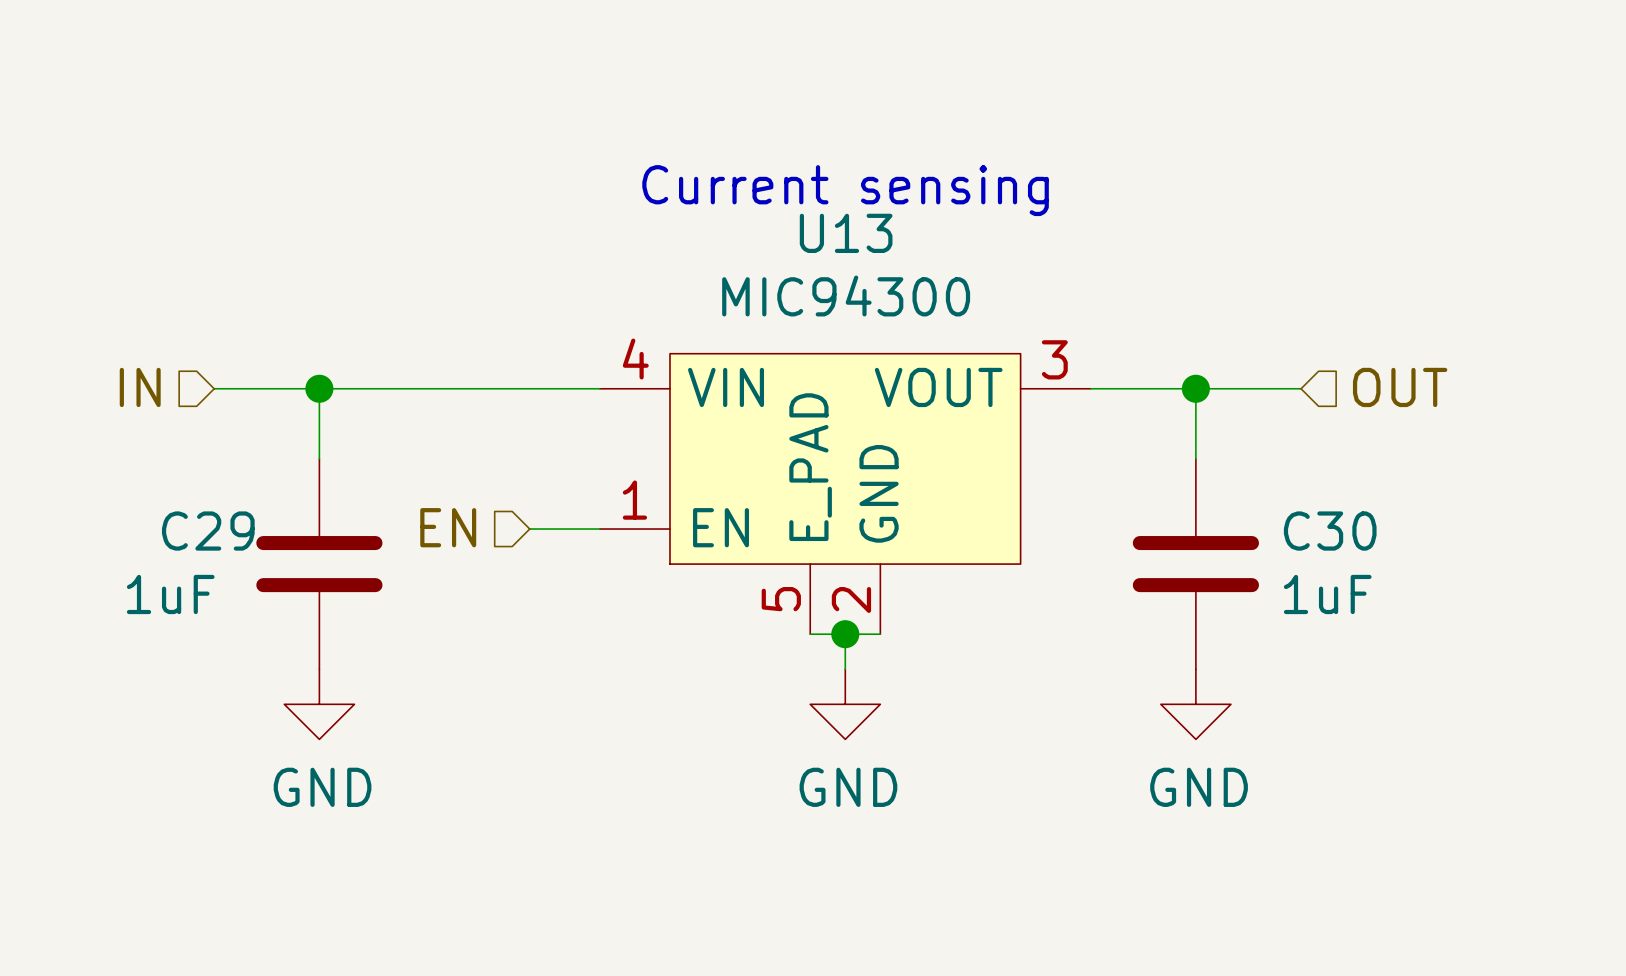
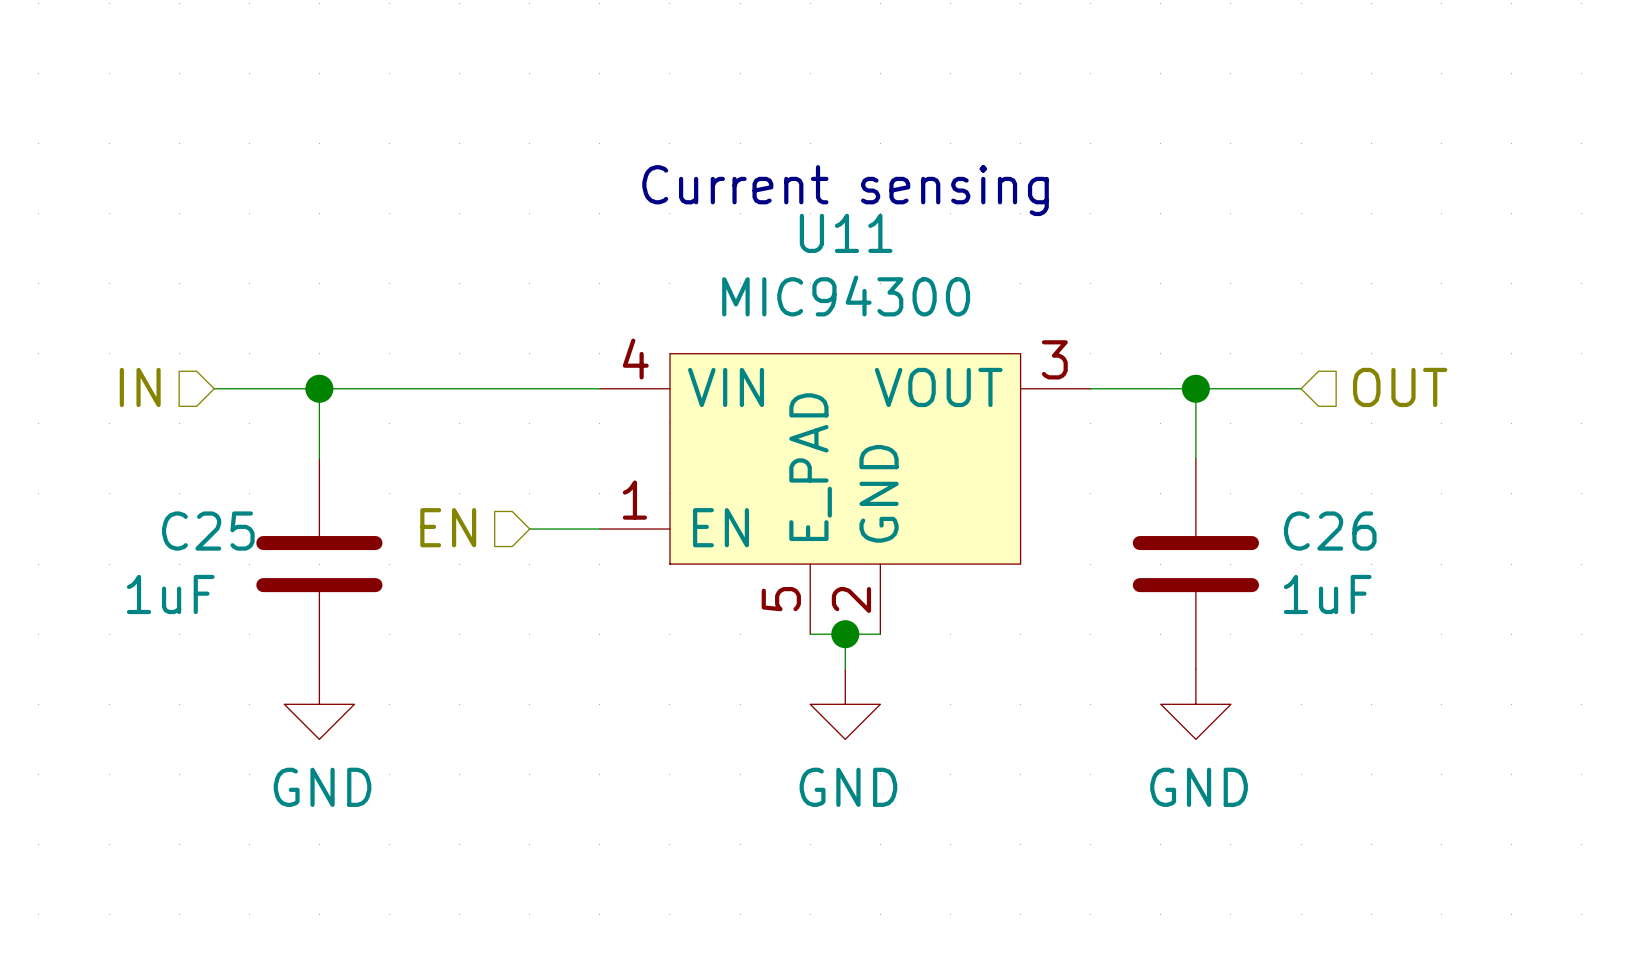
U13 name: U13 (846, 233) -> U11 (846, 233)
C29 name: C29 (208, 531) -> C25 (208, 531)
C30 name: C30 (1330, 531) -> C26 (1330, 531)

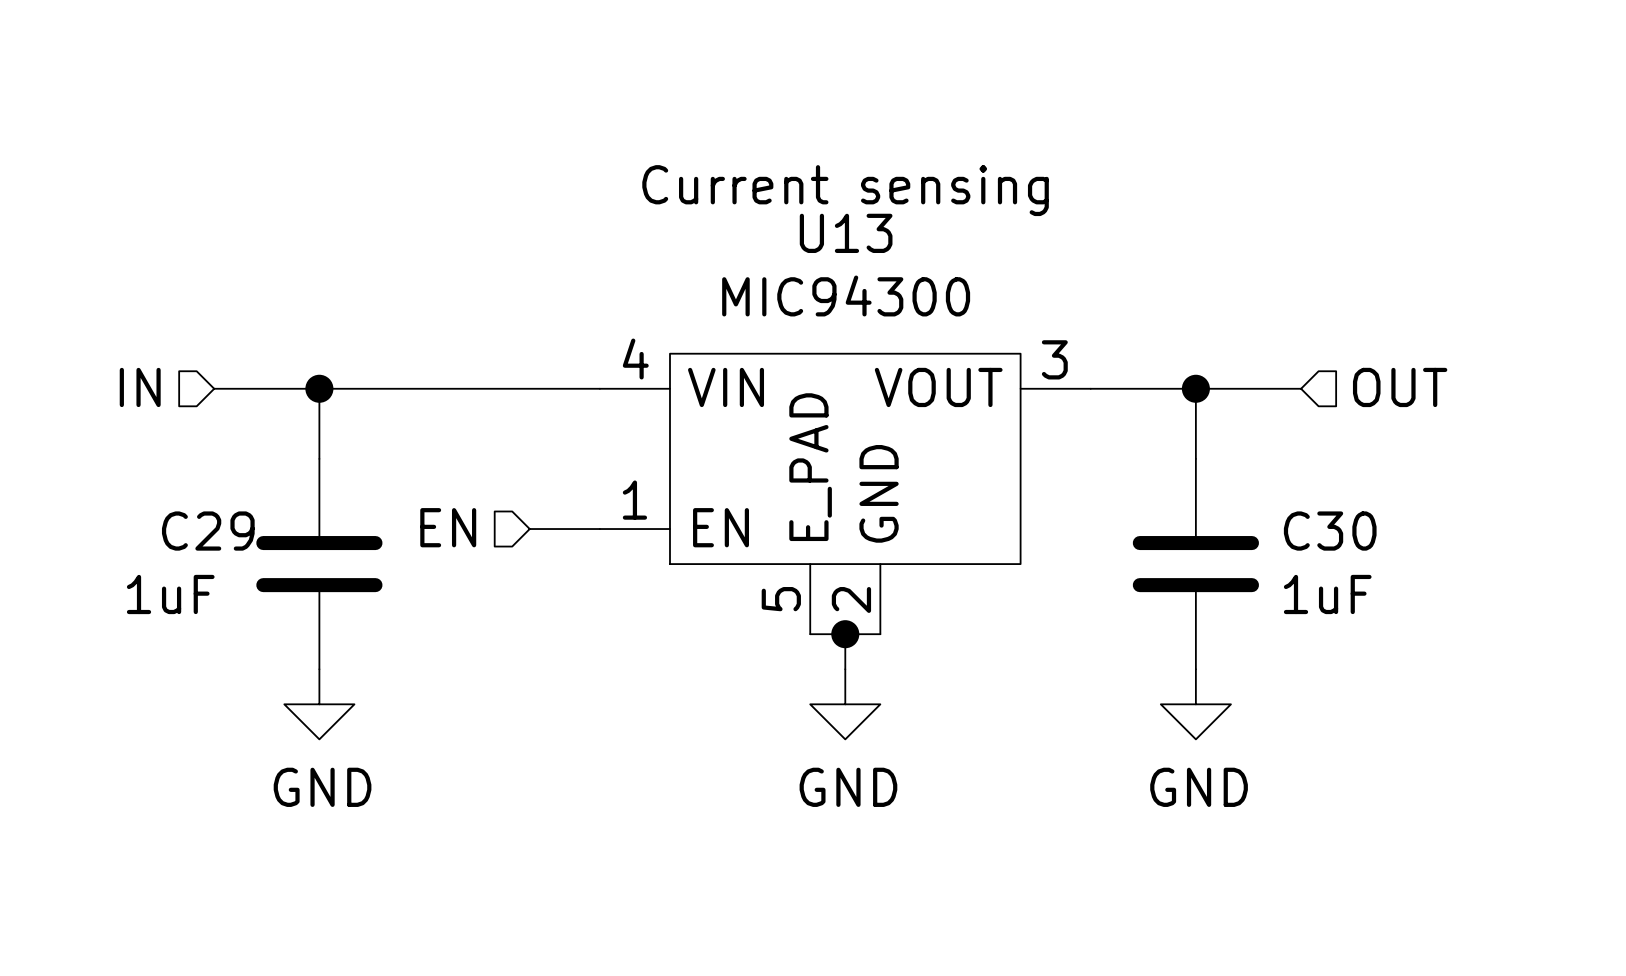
U11 name: U11 (846, 233) -> U13 (846, 233)
C25 name: C25 (208, 531) -> C29 (208, 531)
C26 name: C26 (1330, 531) -> C30 (1330, 531)

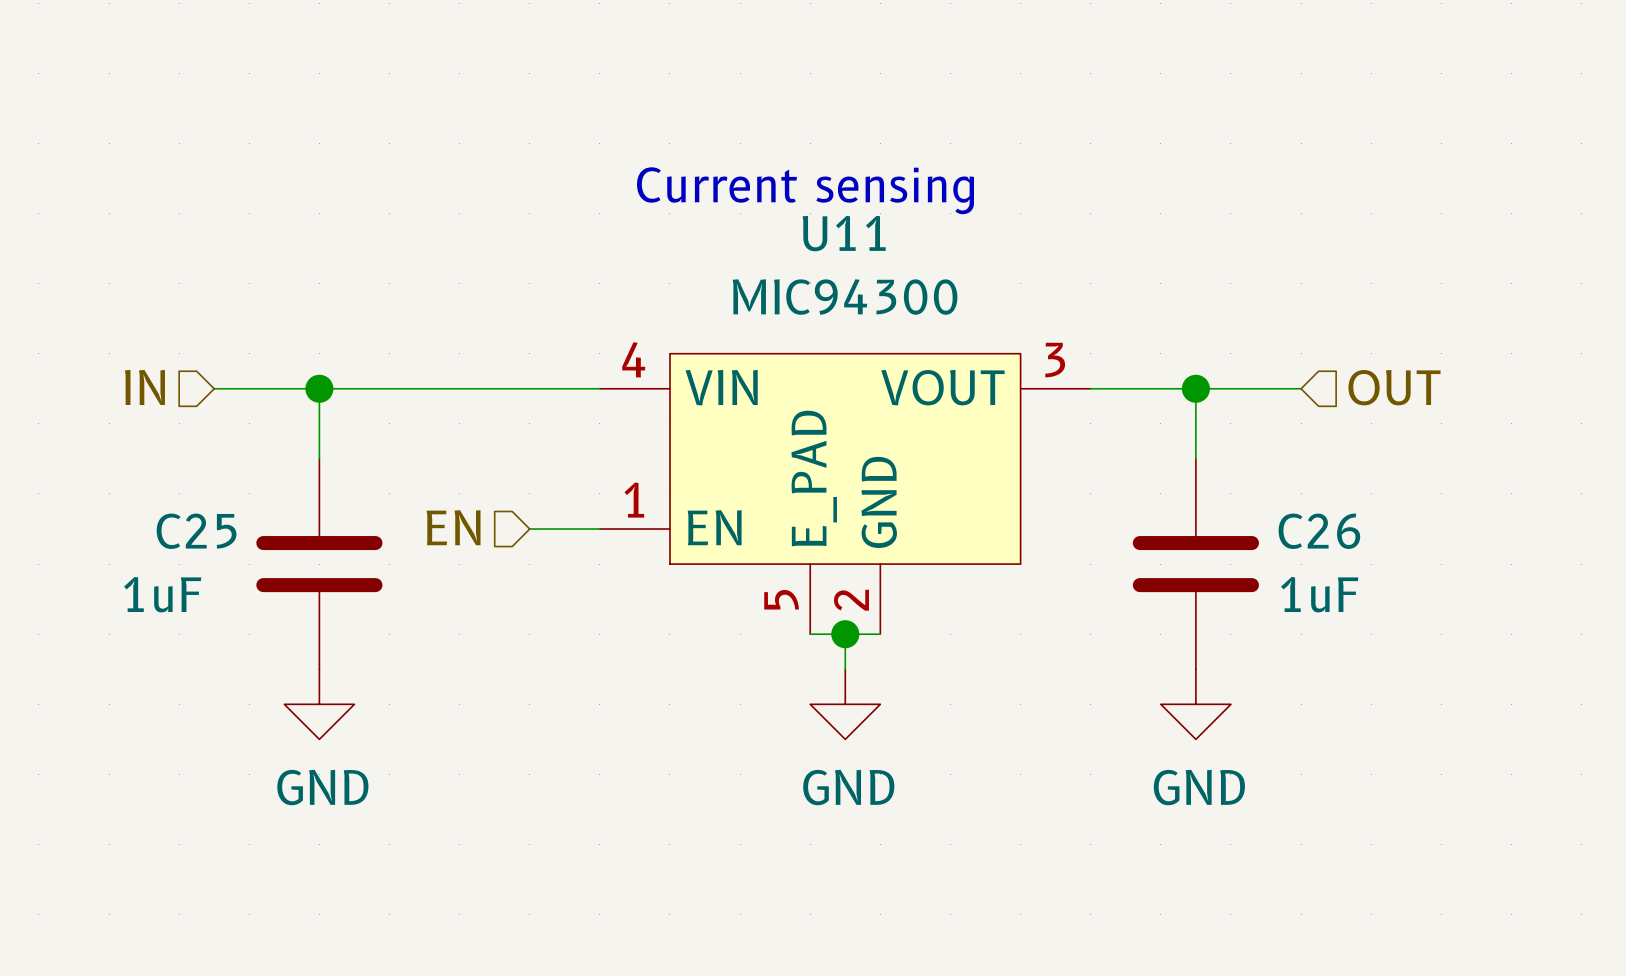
U13 name: U13 (846, 233) -> U11 (844, 233)
C29 name: C29 (208, 531) -> C25 (196, 531)
C30 name: C30 (1330, 531) -> C26 (1319, 531)

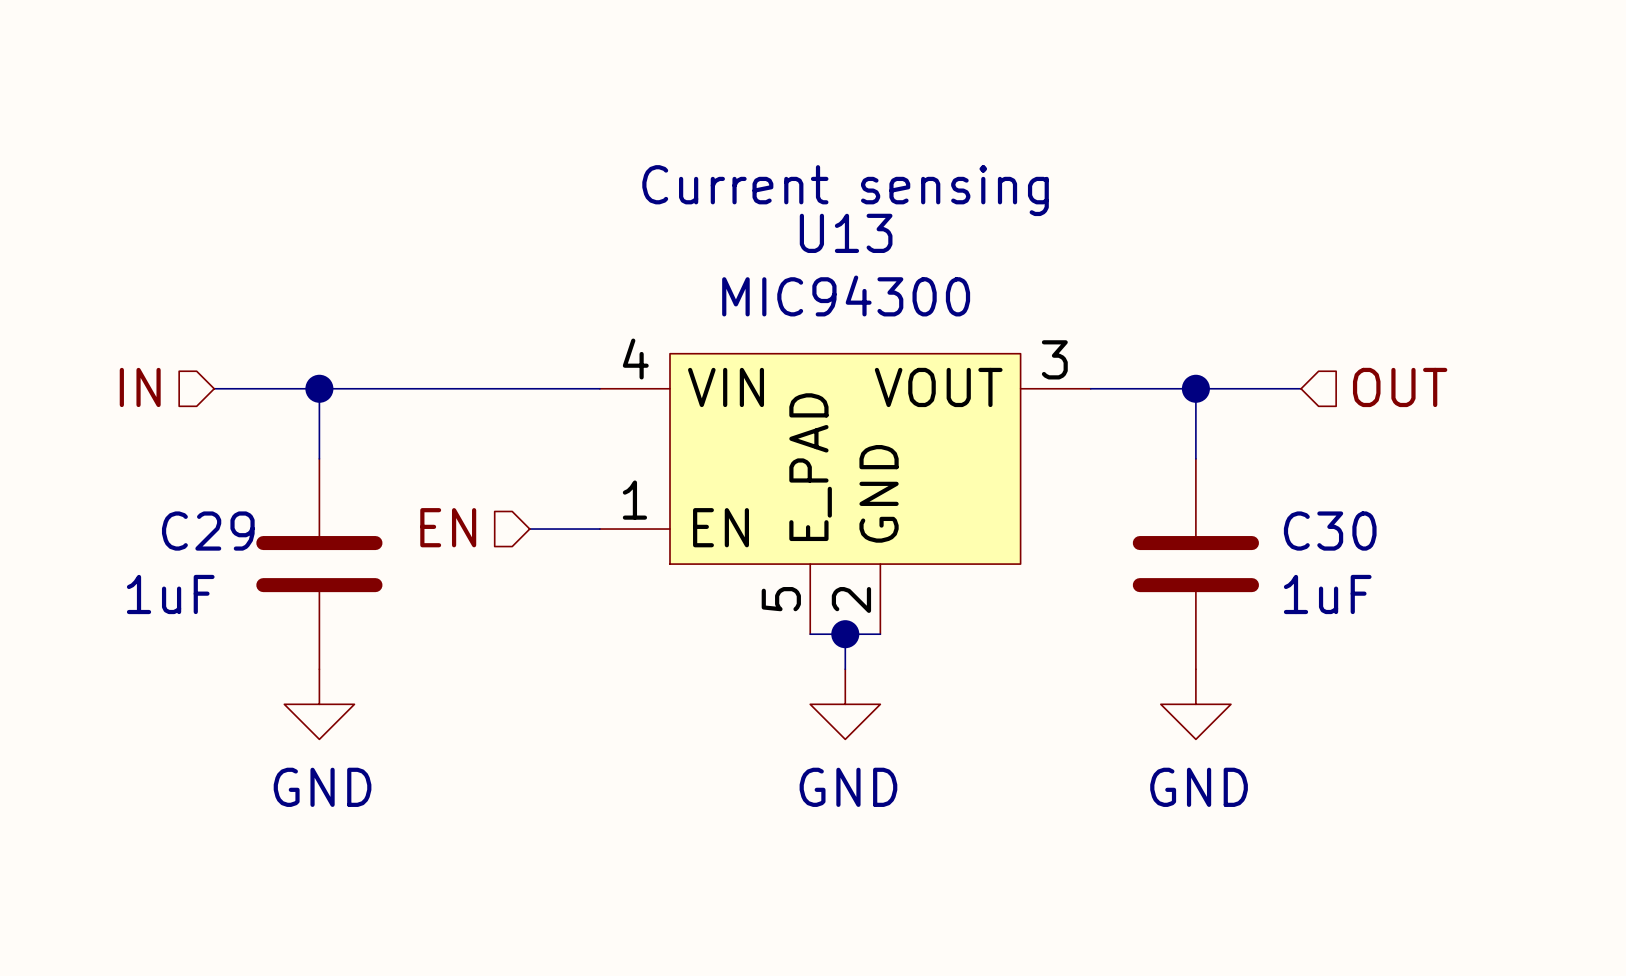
U11 name: U11 (844, 233) -> U13 (846, 233)
C25 name: C25 (196, 531) -> C29 (208, 531)
C26 name: C26 (1319, 531) -> C30 (1330, 531)

